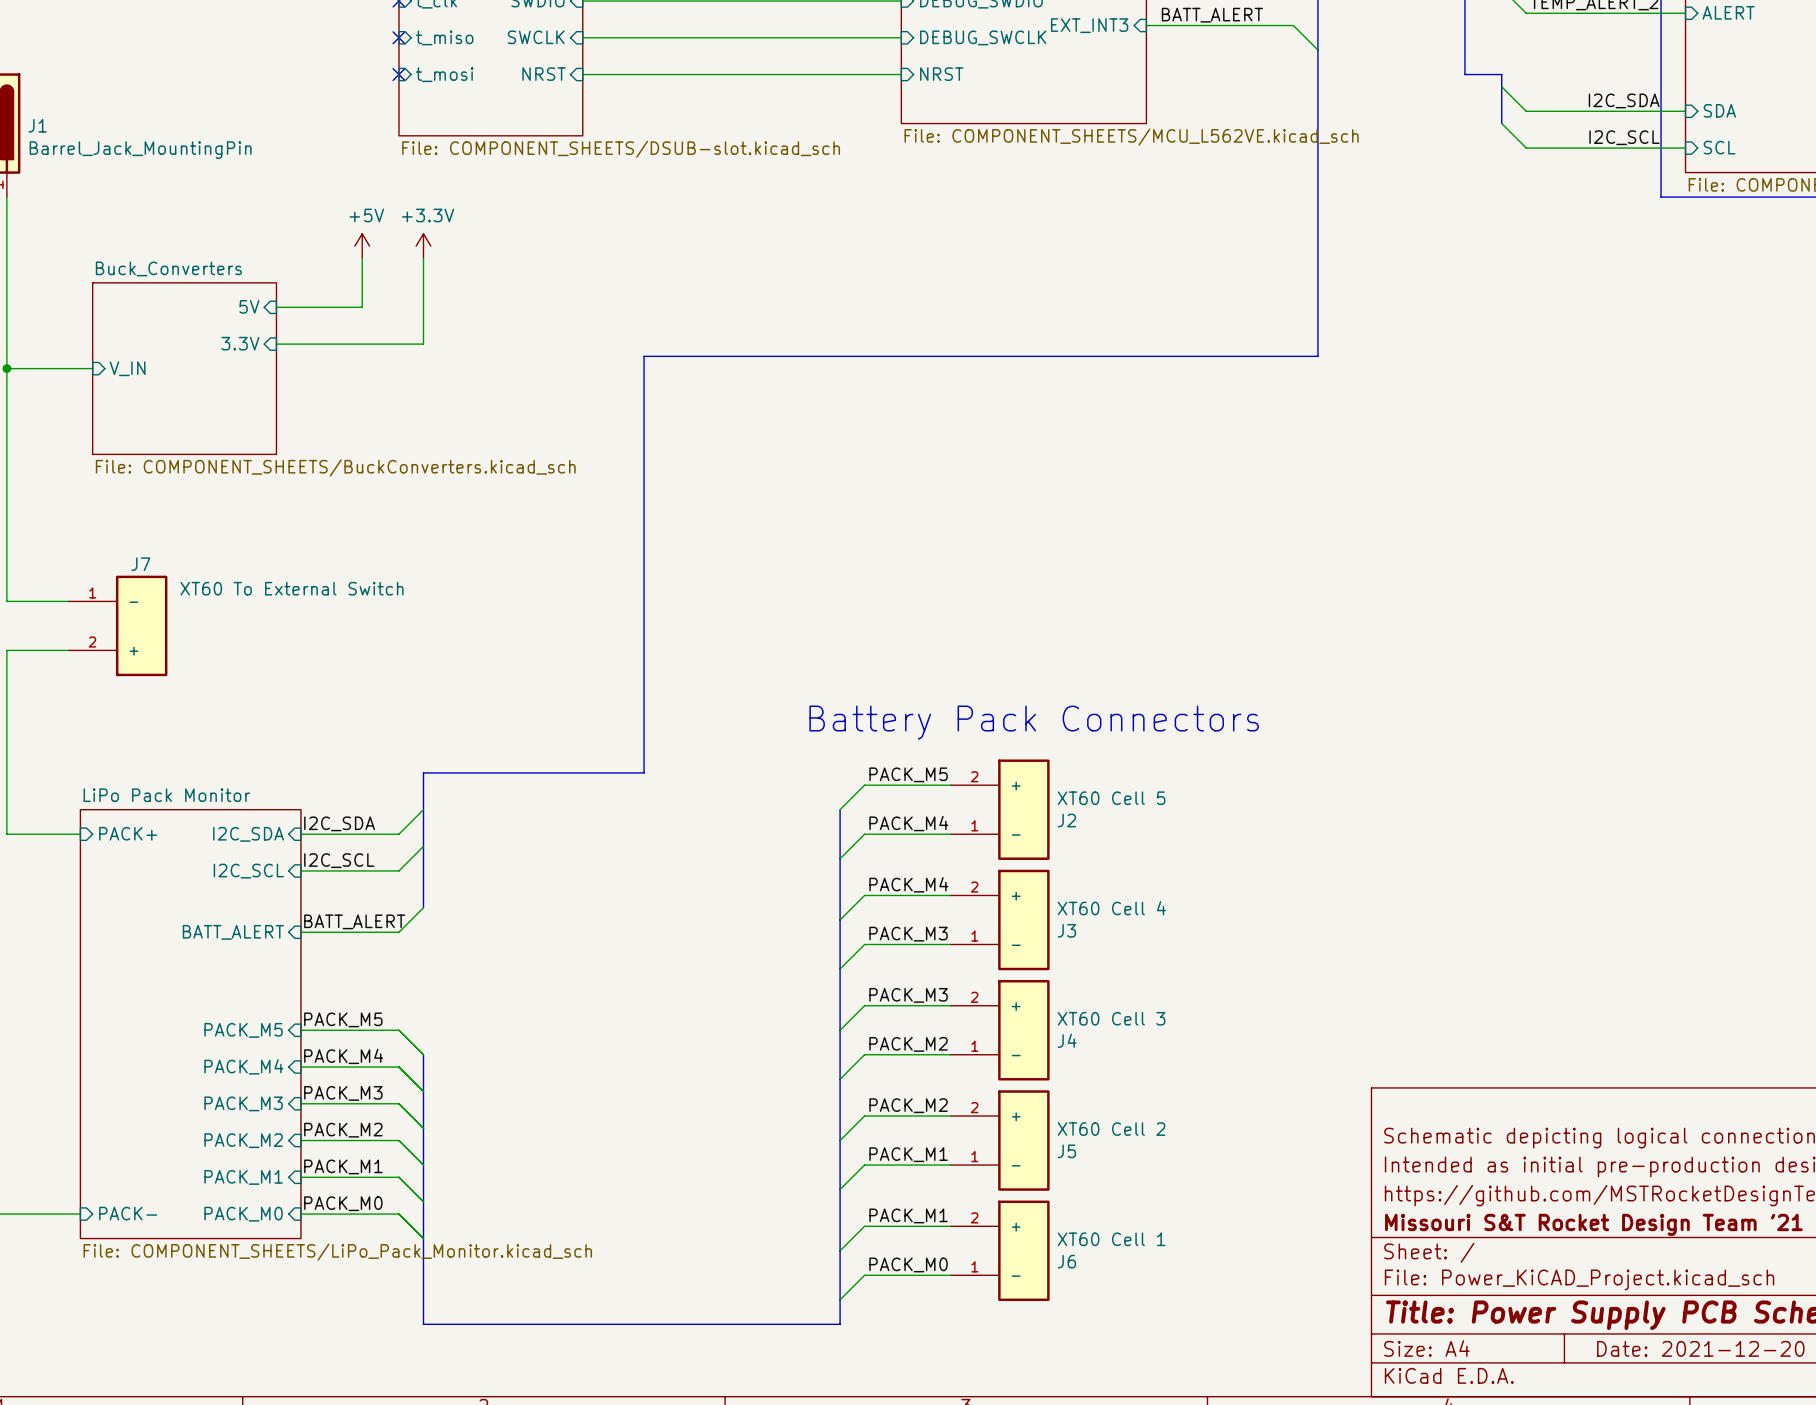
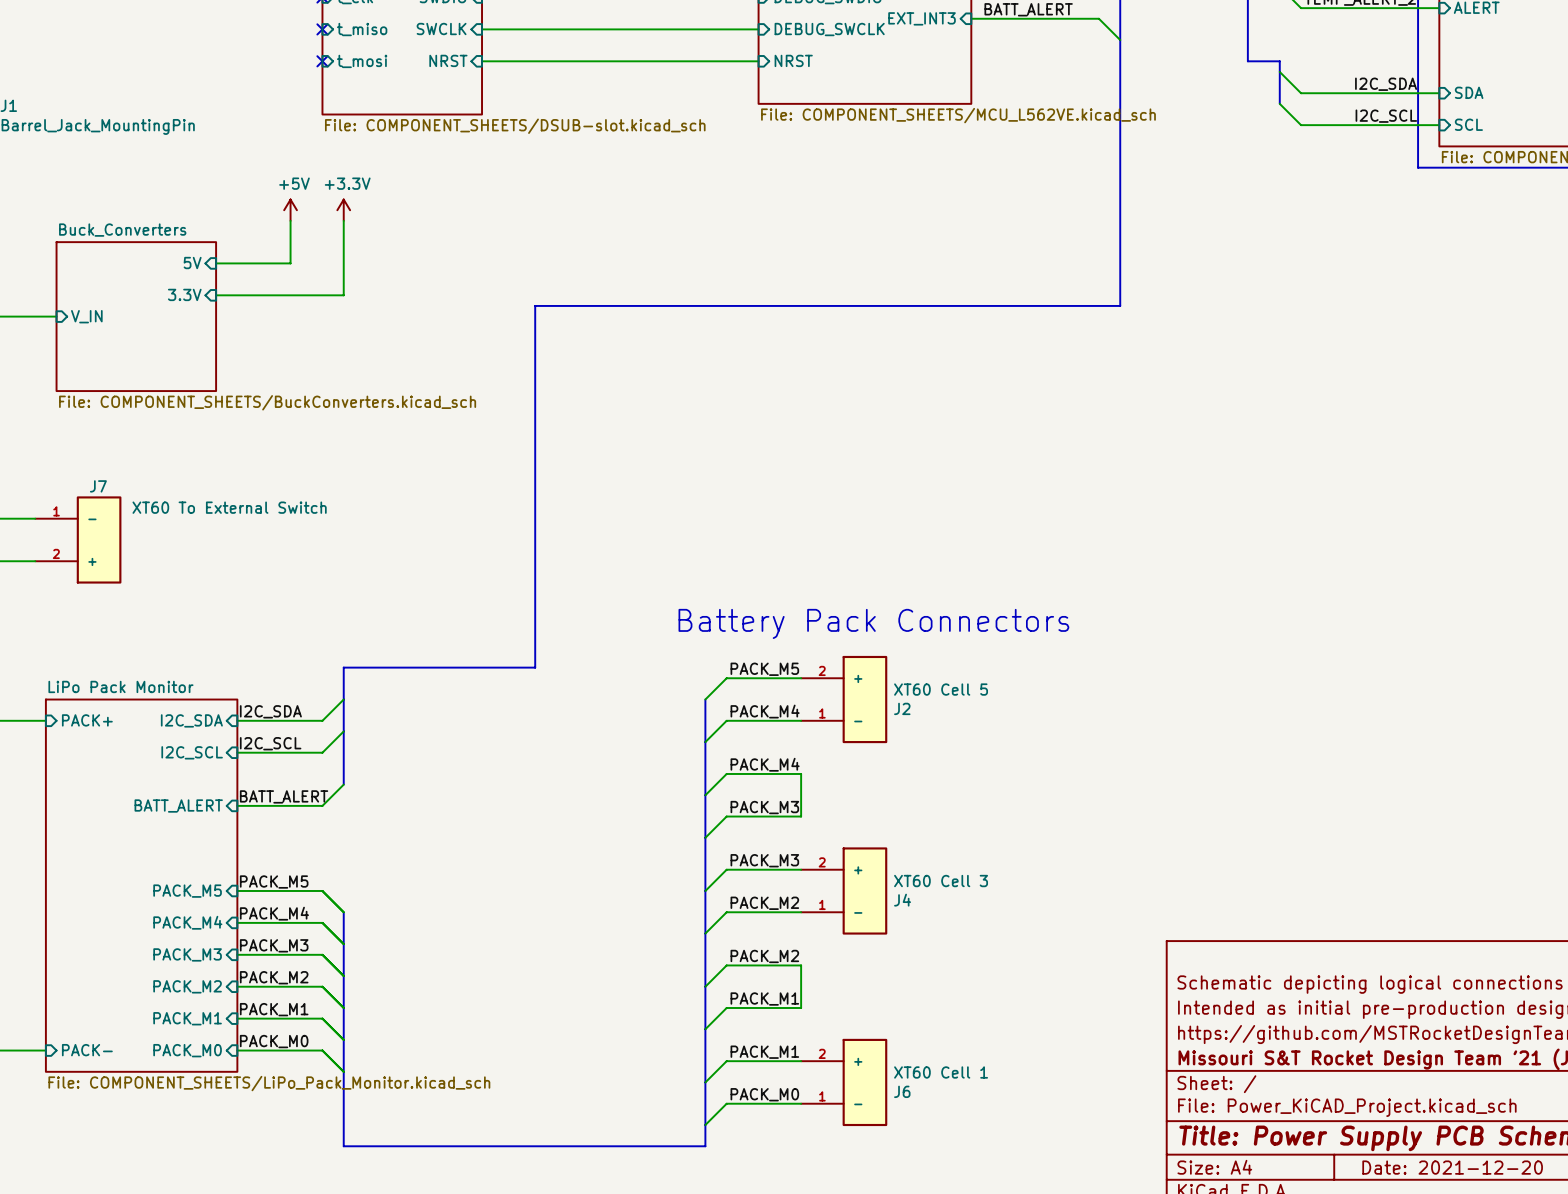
wire: none -> (801, 773) (801, 816)
J3: XT60 Cell 4 (999, 919) -> none
wire: none -> (801, 965) (801, 1008)
J5: XT60 Cell 2 (999, 1140) -> none

